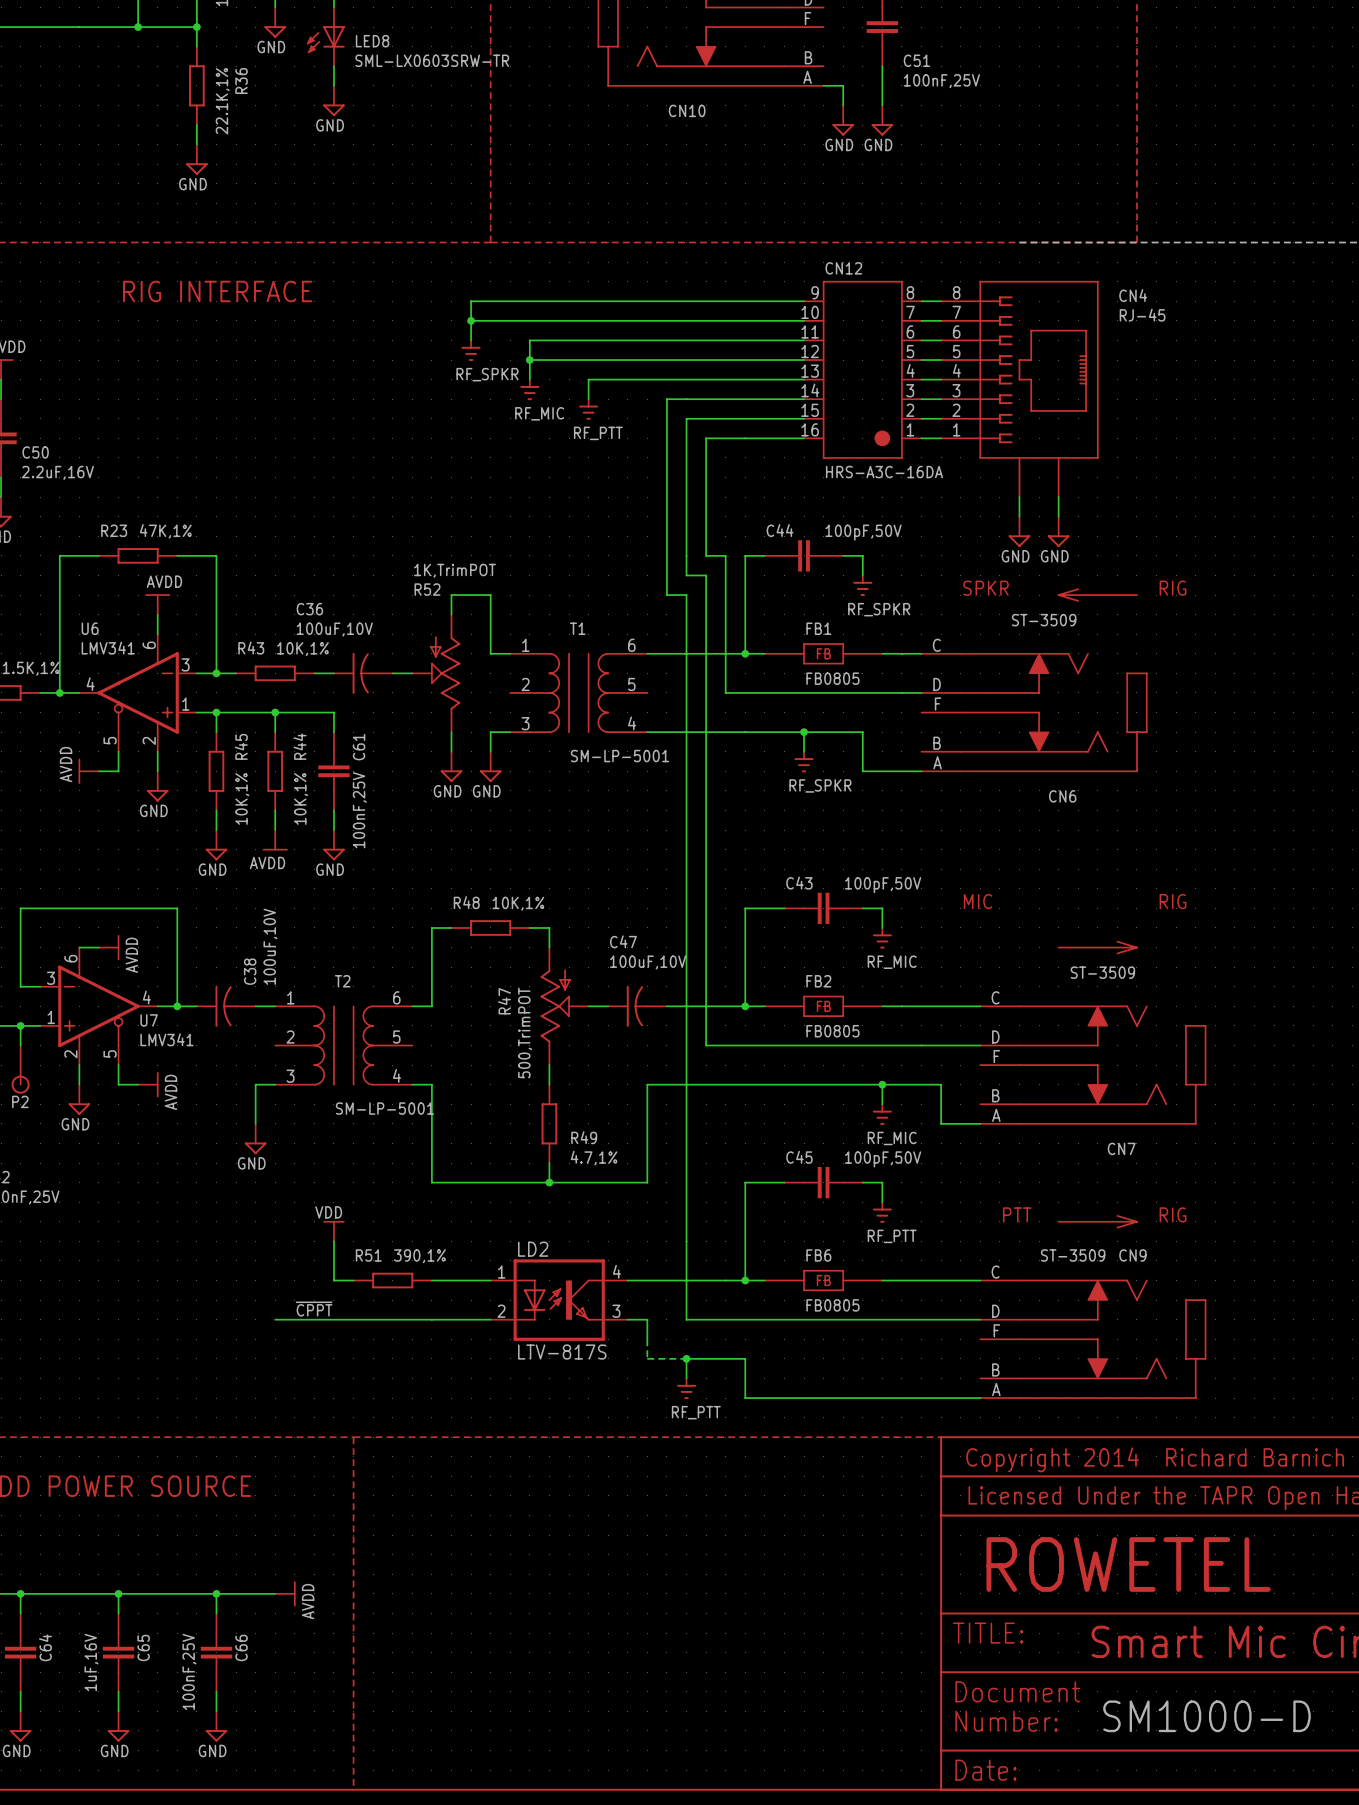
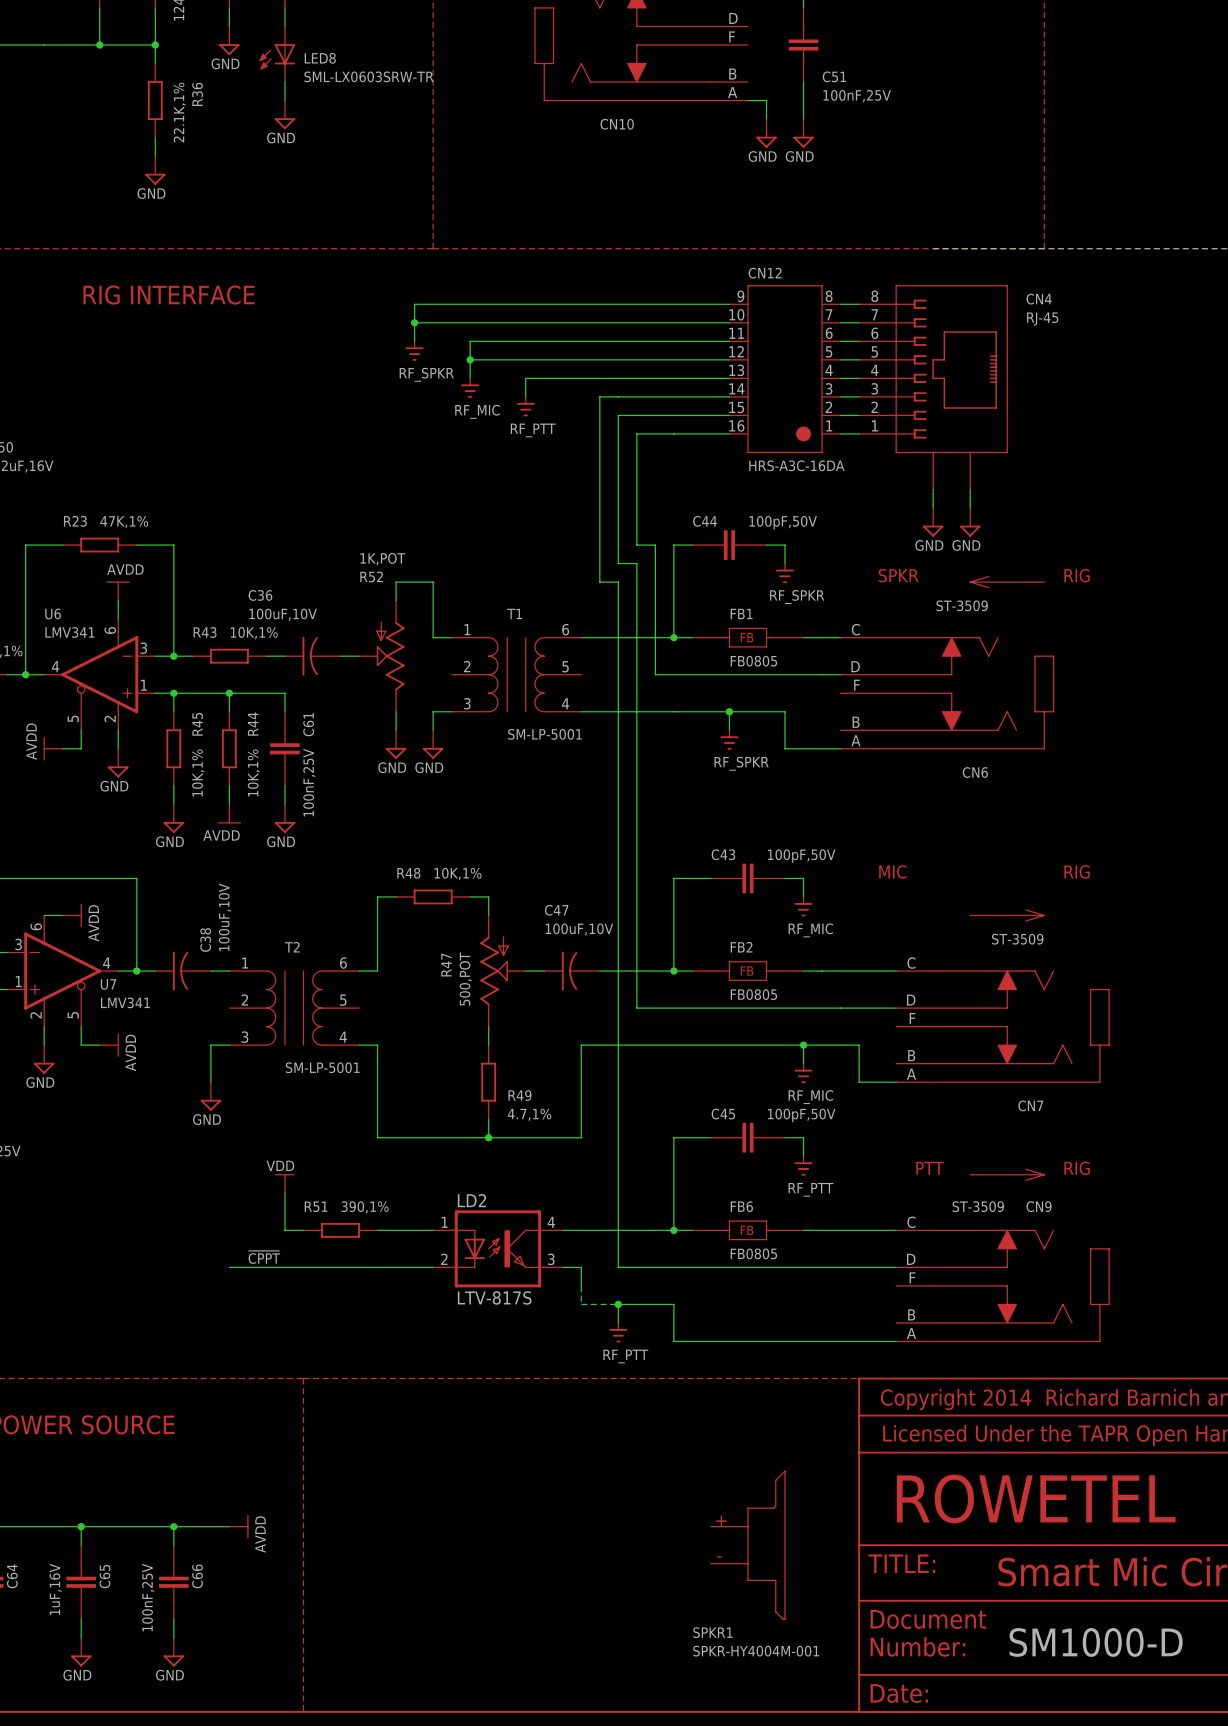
R52 value: 1K,TrimPOT (455, 570) -> 1K,POT (382, 559)
R47 value: 500,TrimPOT (525, 1032) -> 500,POT (465, 979)
SPKR1: none -> SPKR-HY4004M-001 (747, 1545)

